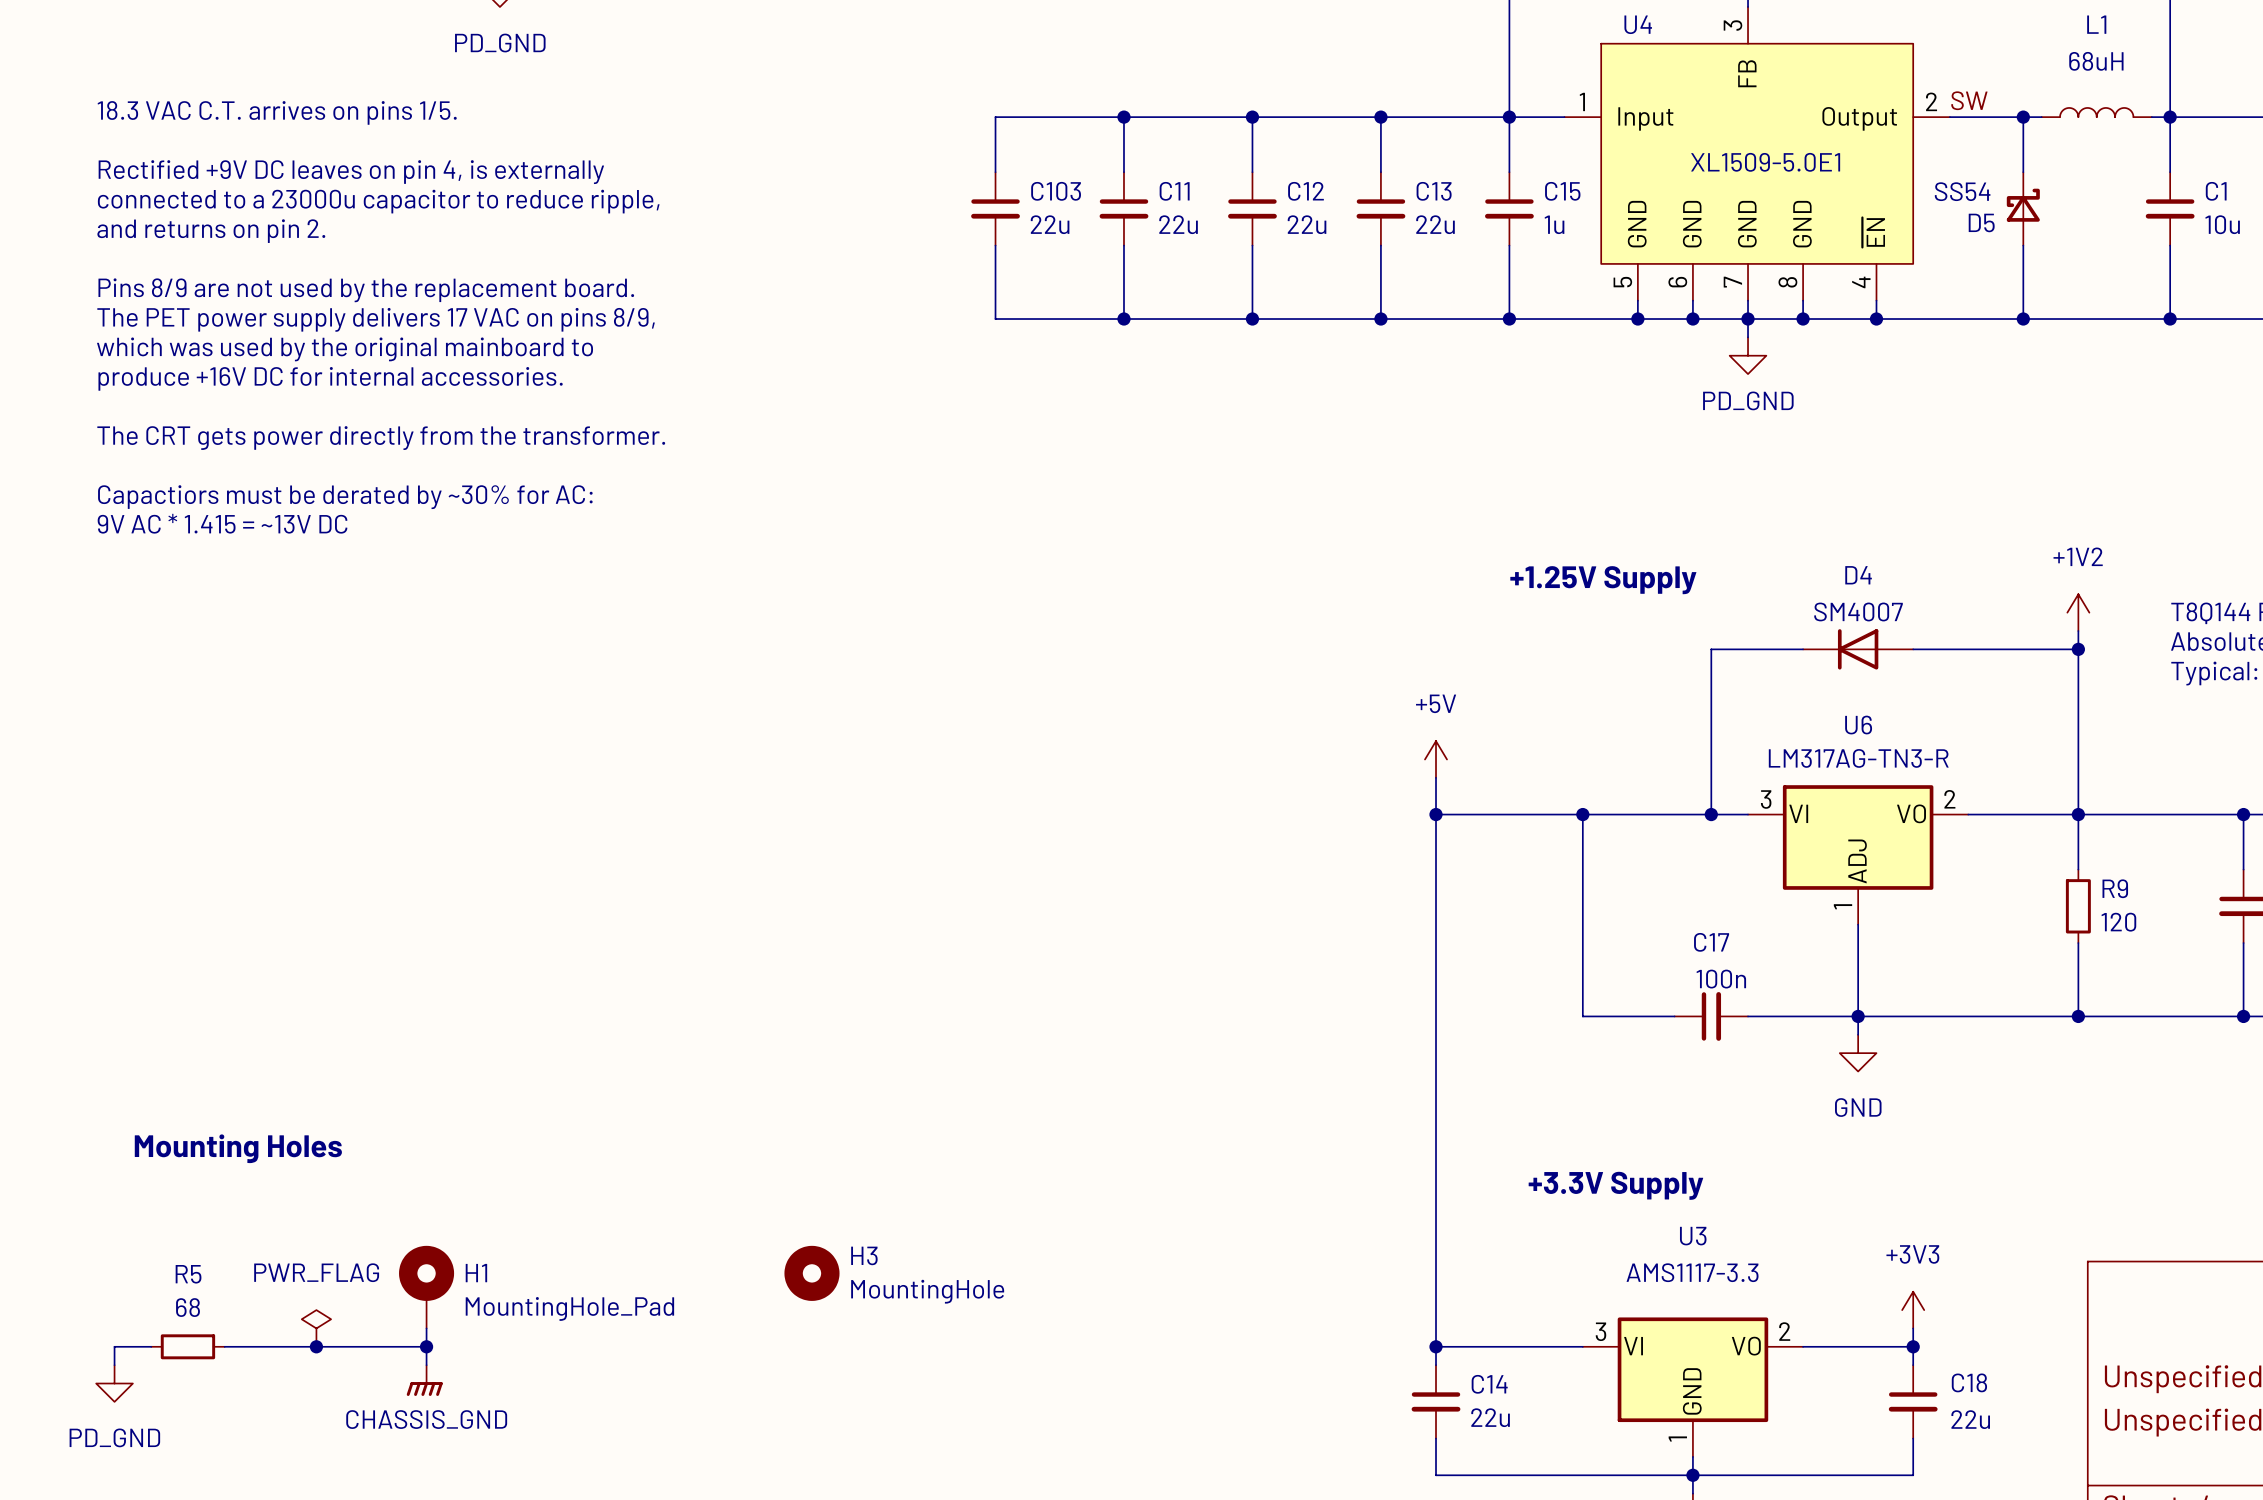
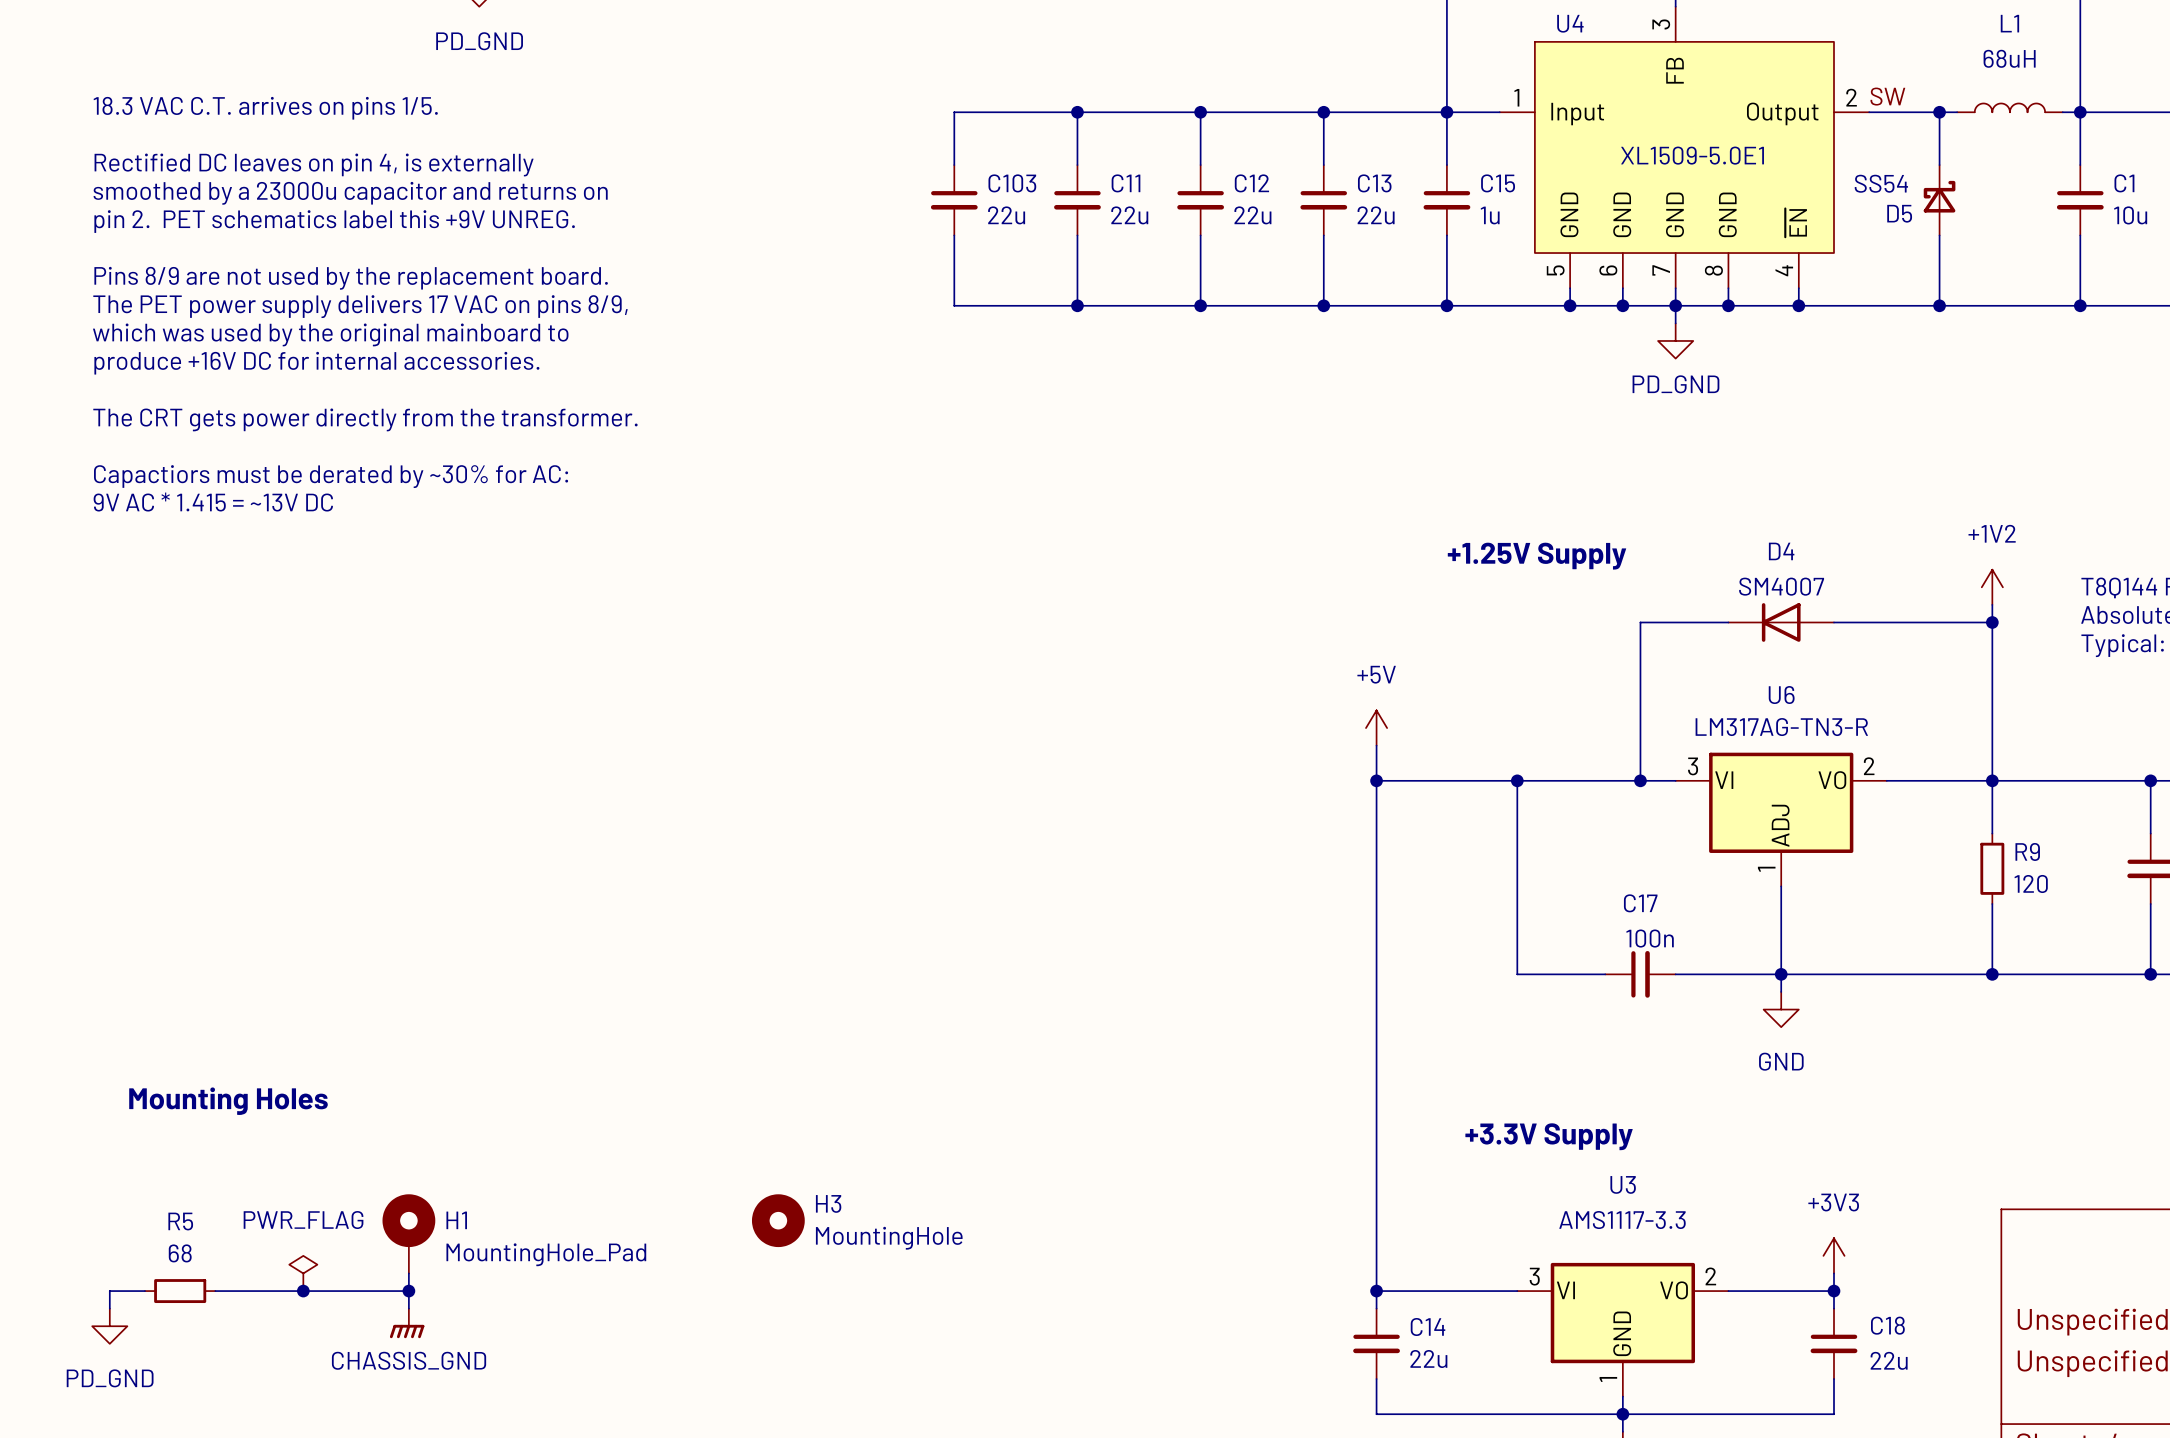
text: Rectified +9V DC leaves on pin 4, is externally (351, 172) -> Rectified DC leaves on pin 4, is externally (314, 164)
text: connected to a 23000u capacitor to reduce ripple, (378, 201) -> smoothed by a 23000u capacitor and returns on (350, 193)
text: and returns on pin 2. (211, 231) -> pin 2. PET schematics label this +9V UNREG. (334, 221)

